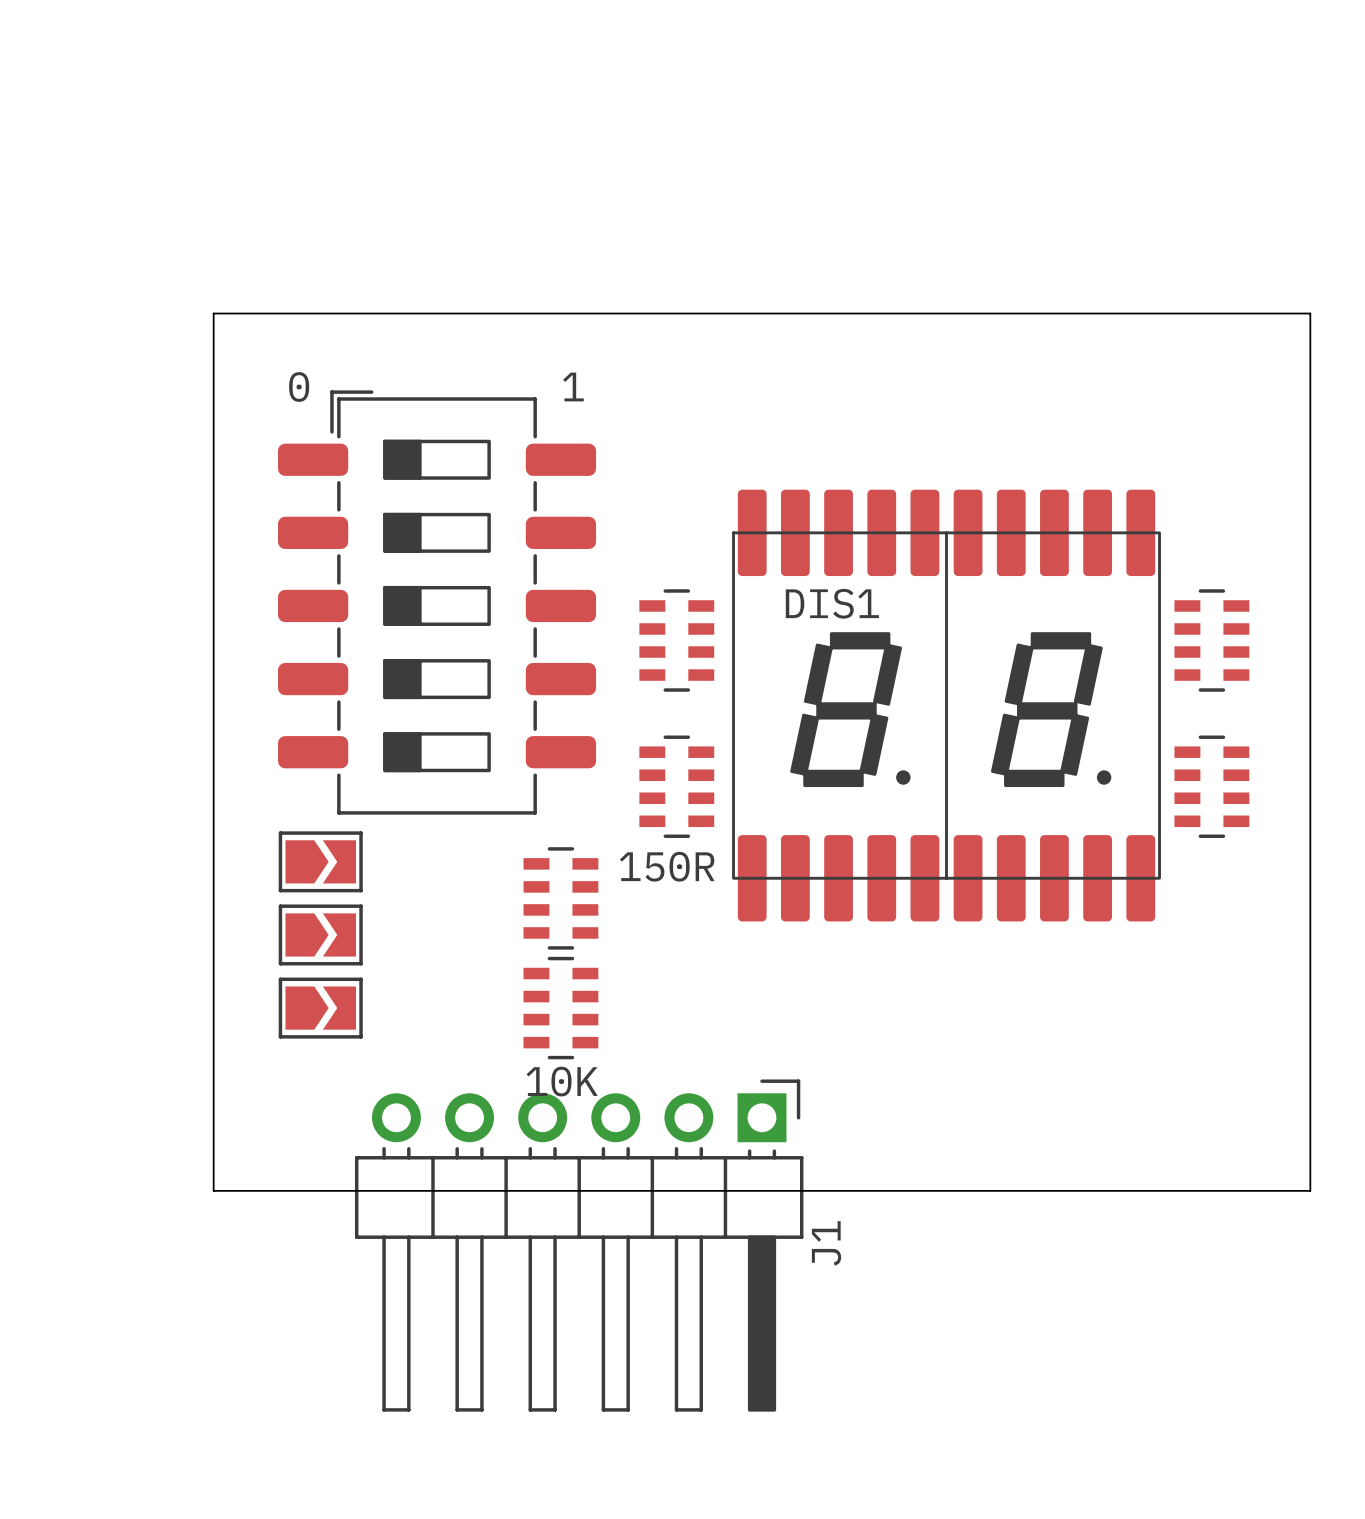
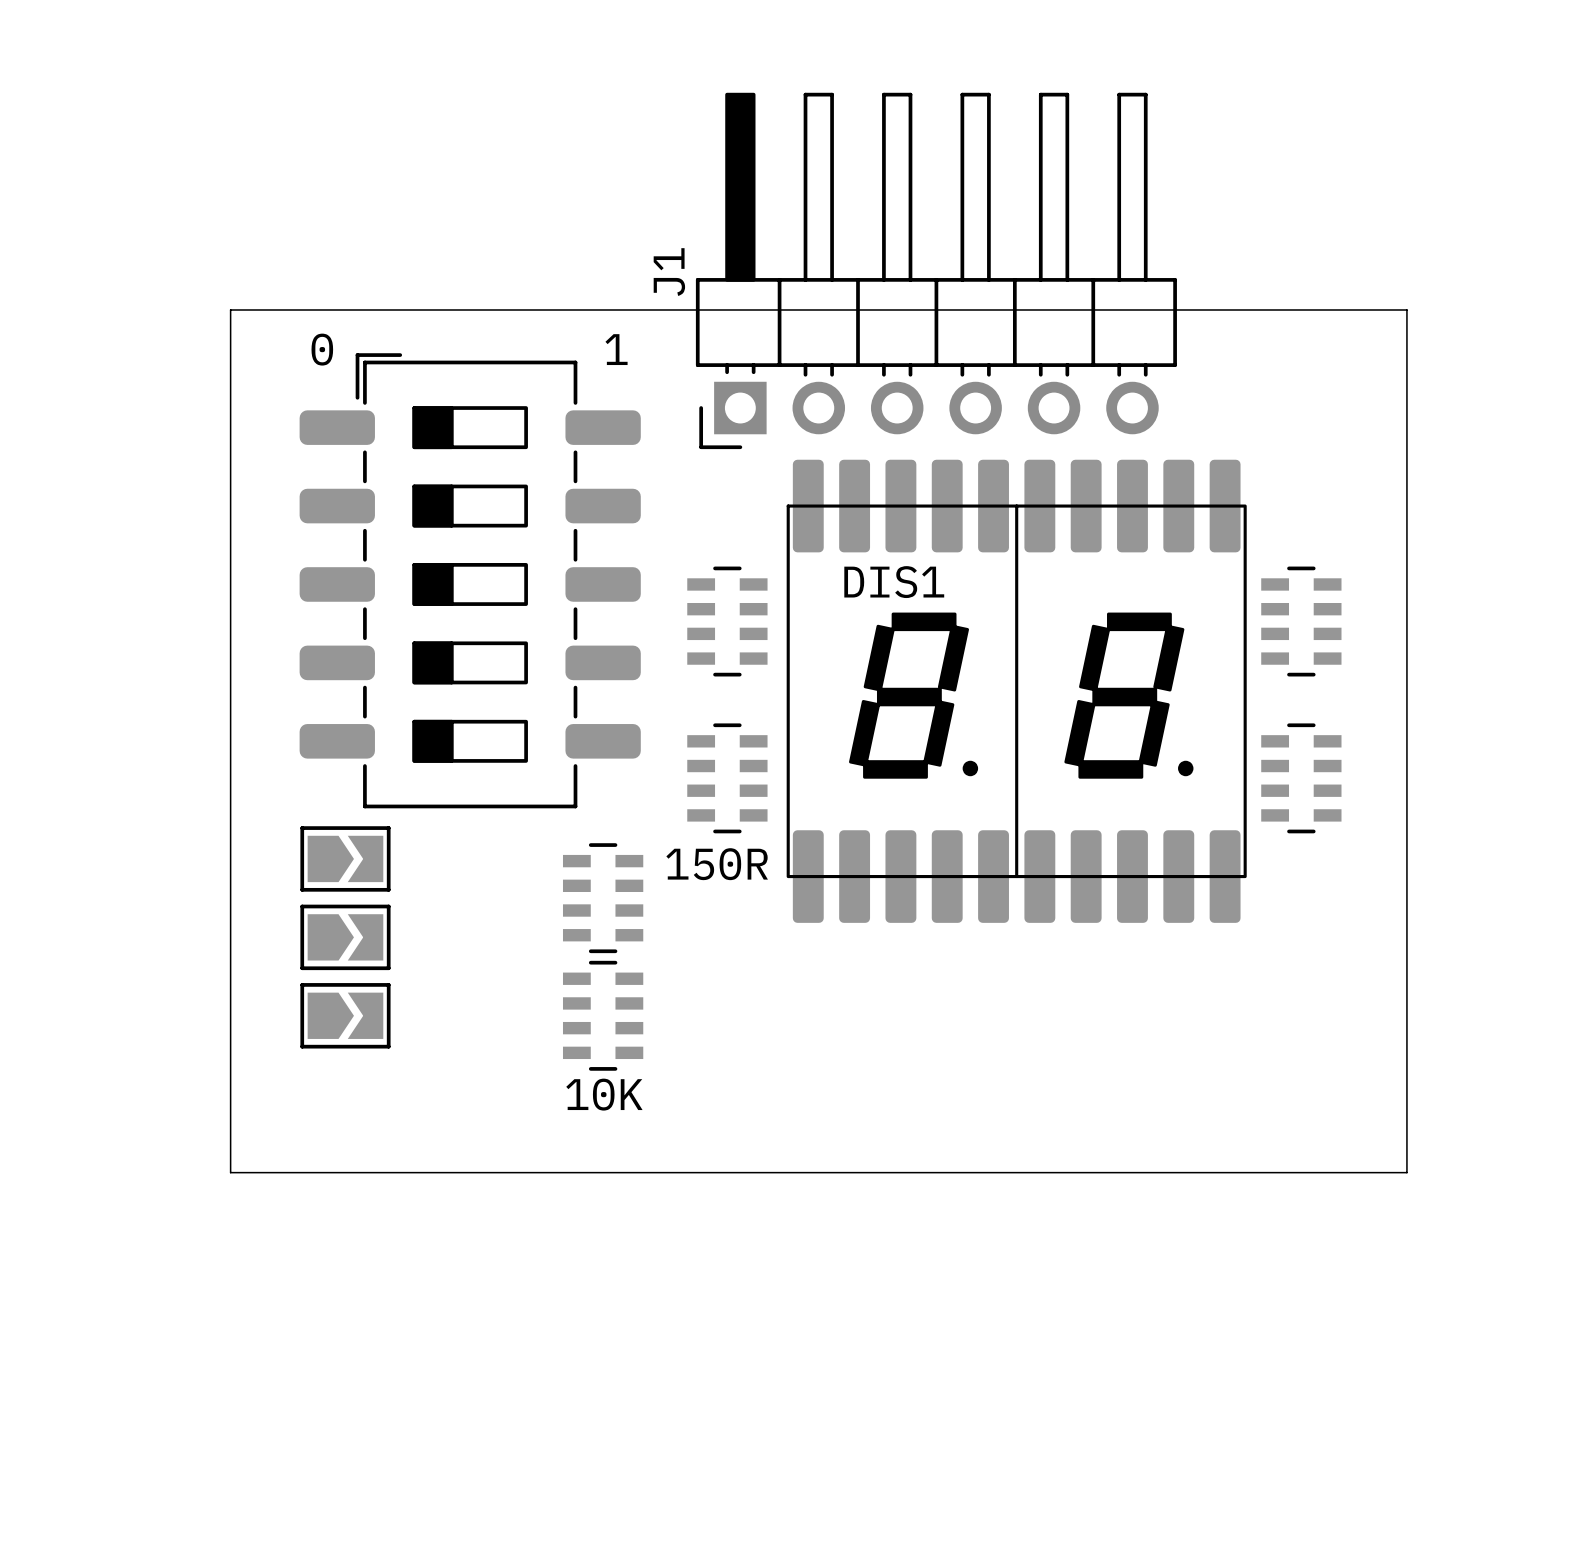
board edge: (213, 350) (213, 313) (1310, 313) (1310, 350) -> (230, 309) (1406, 309)
board edge: (213, 1154) (213, 1190) (1310, 1190) (1310, 1154) -> (230, 1172) (1406, 1172)
J1 rotation: 0° (579, 1245) -> 180° (936, 270)
J1 position: (579, 1245) -> (936, 270)

